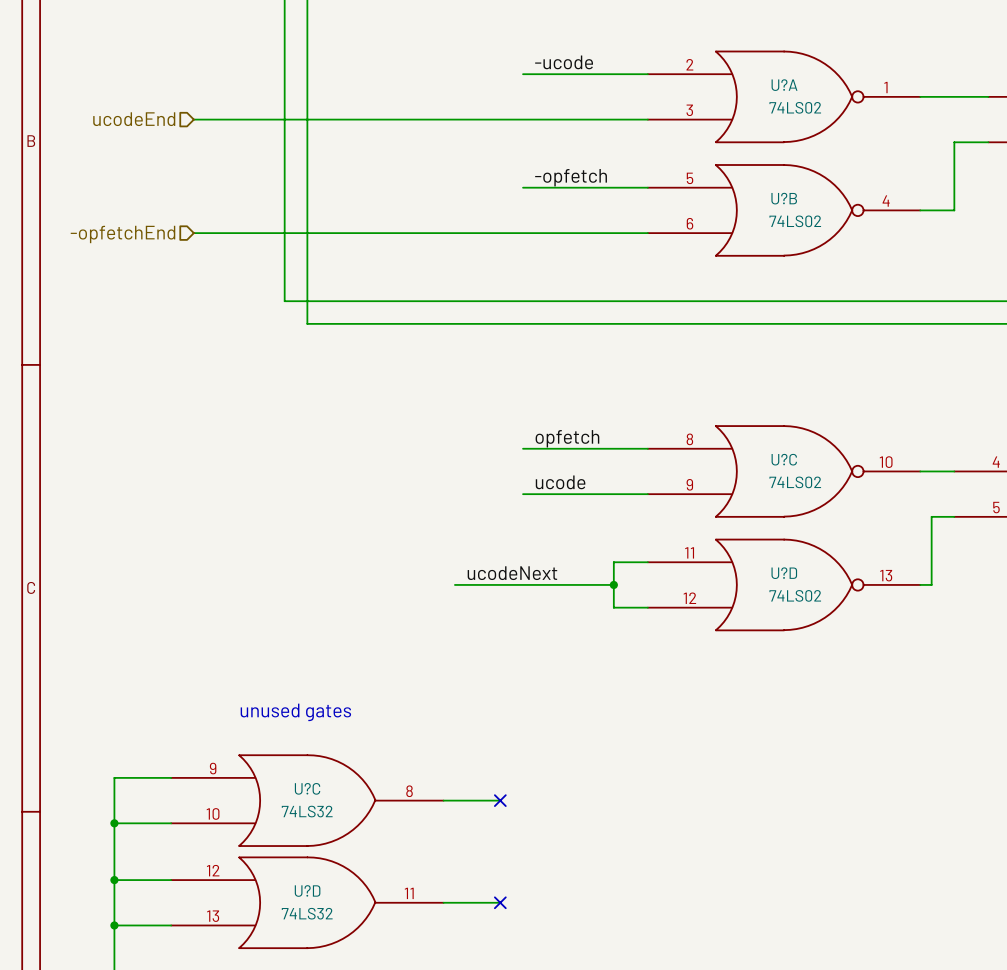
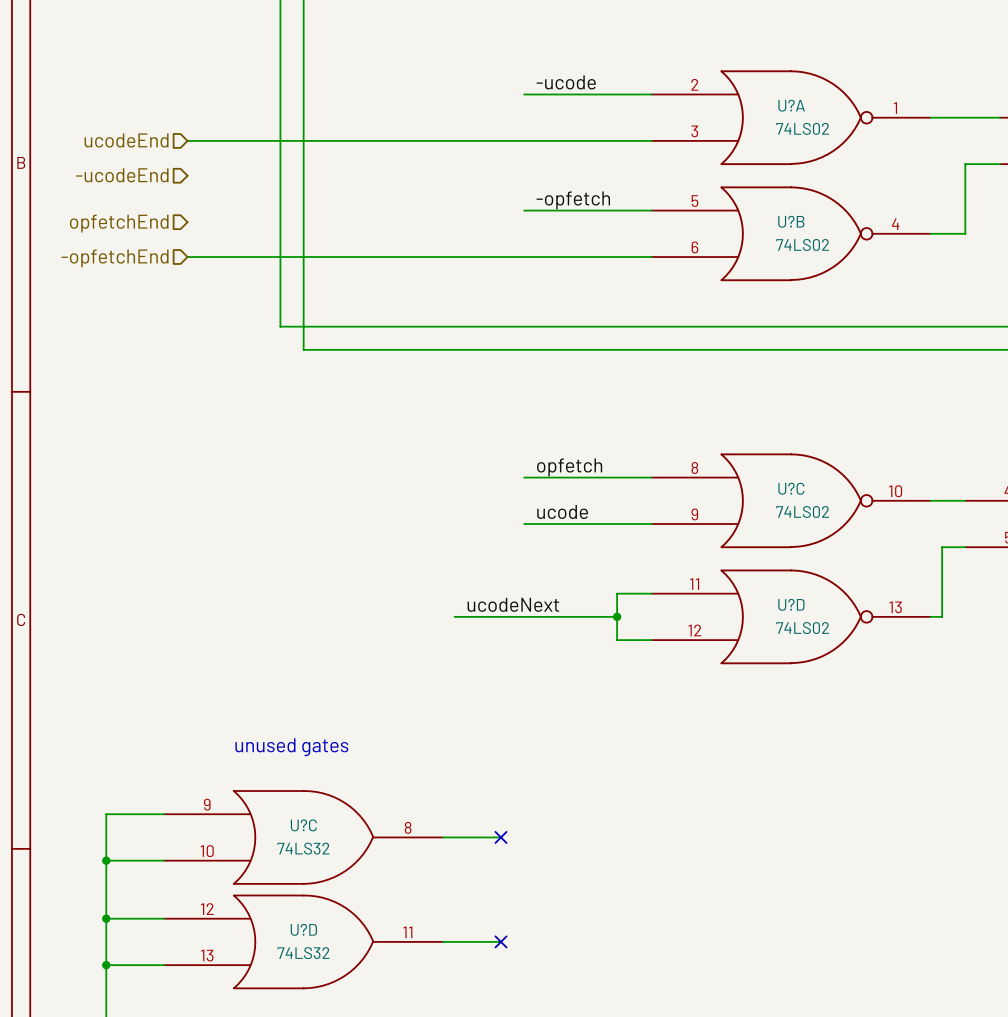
hierarchical label: none -> -ucodeEnd (122, 175)
hierarchical label: none -> opfetchEnd (119, 223)

